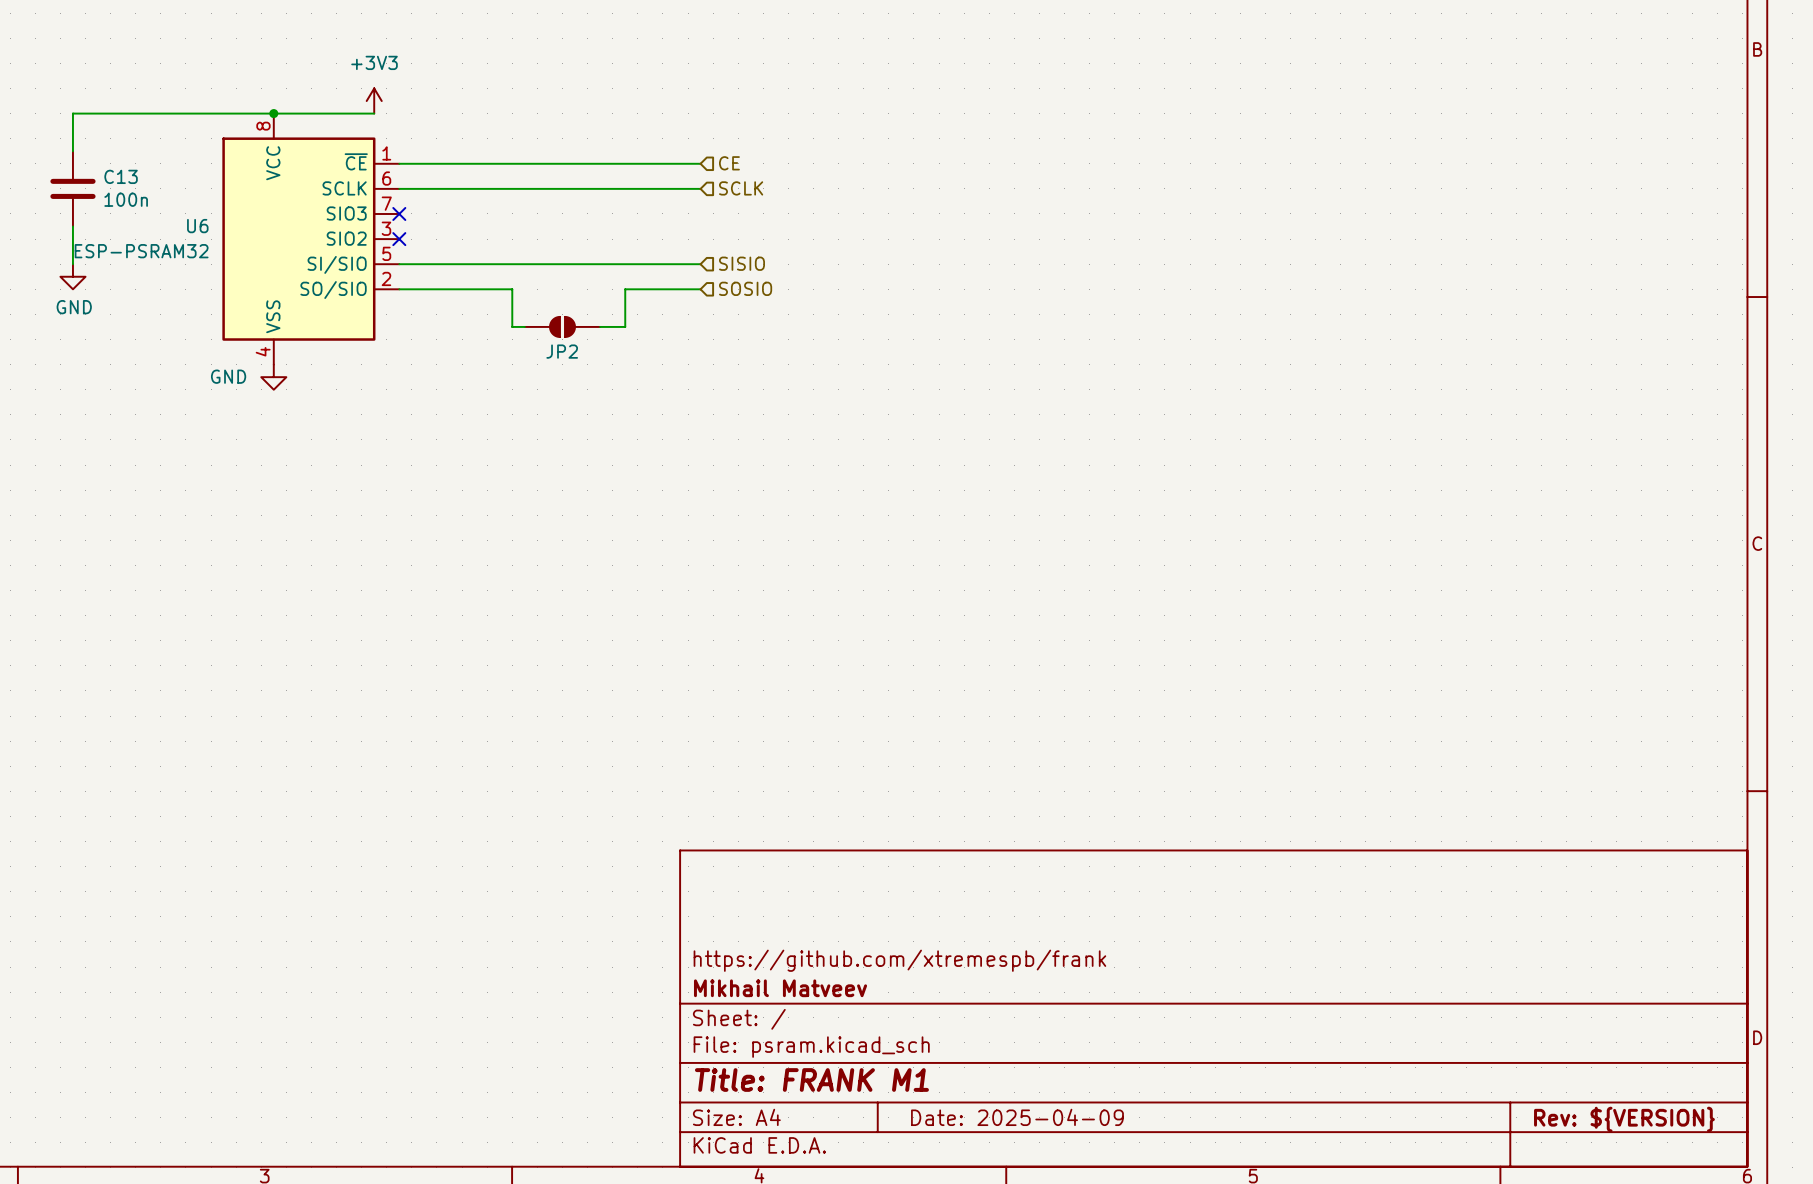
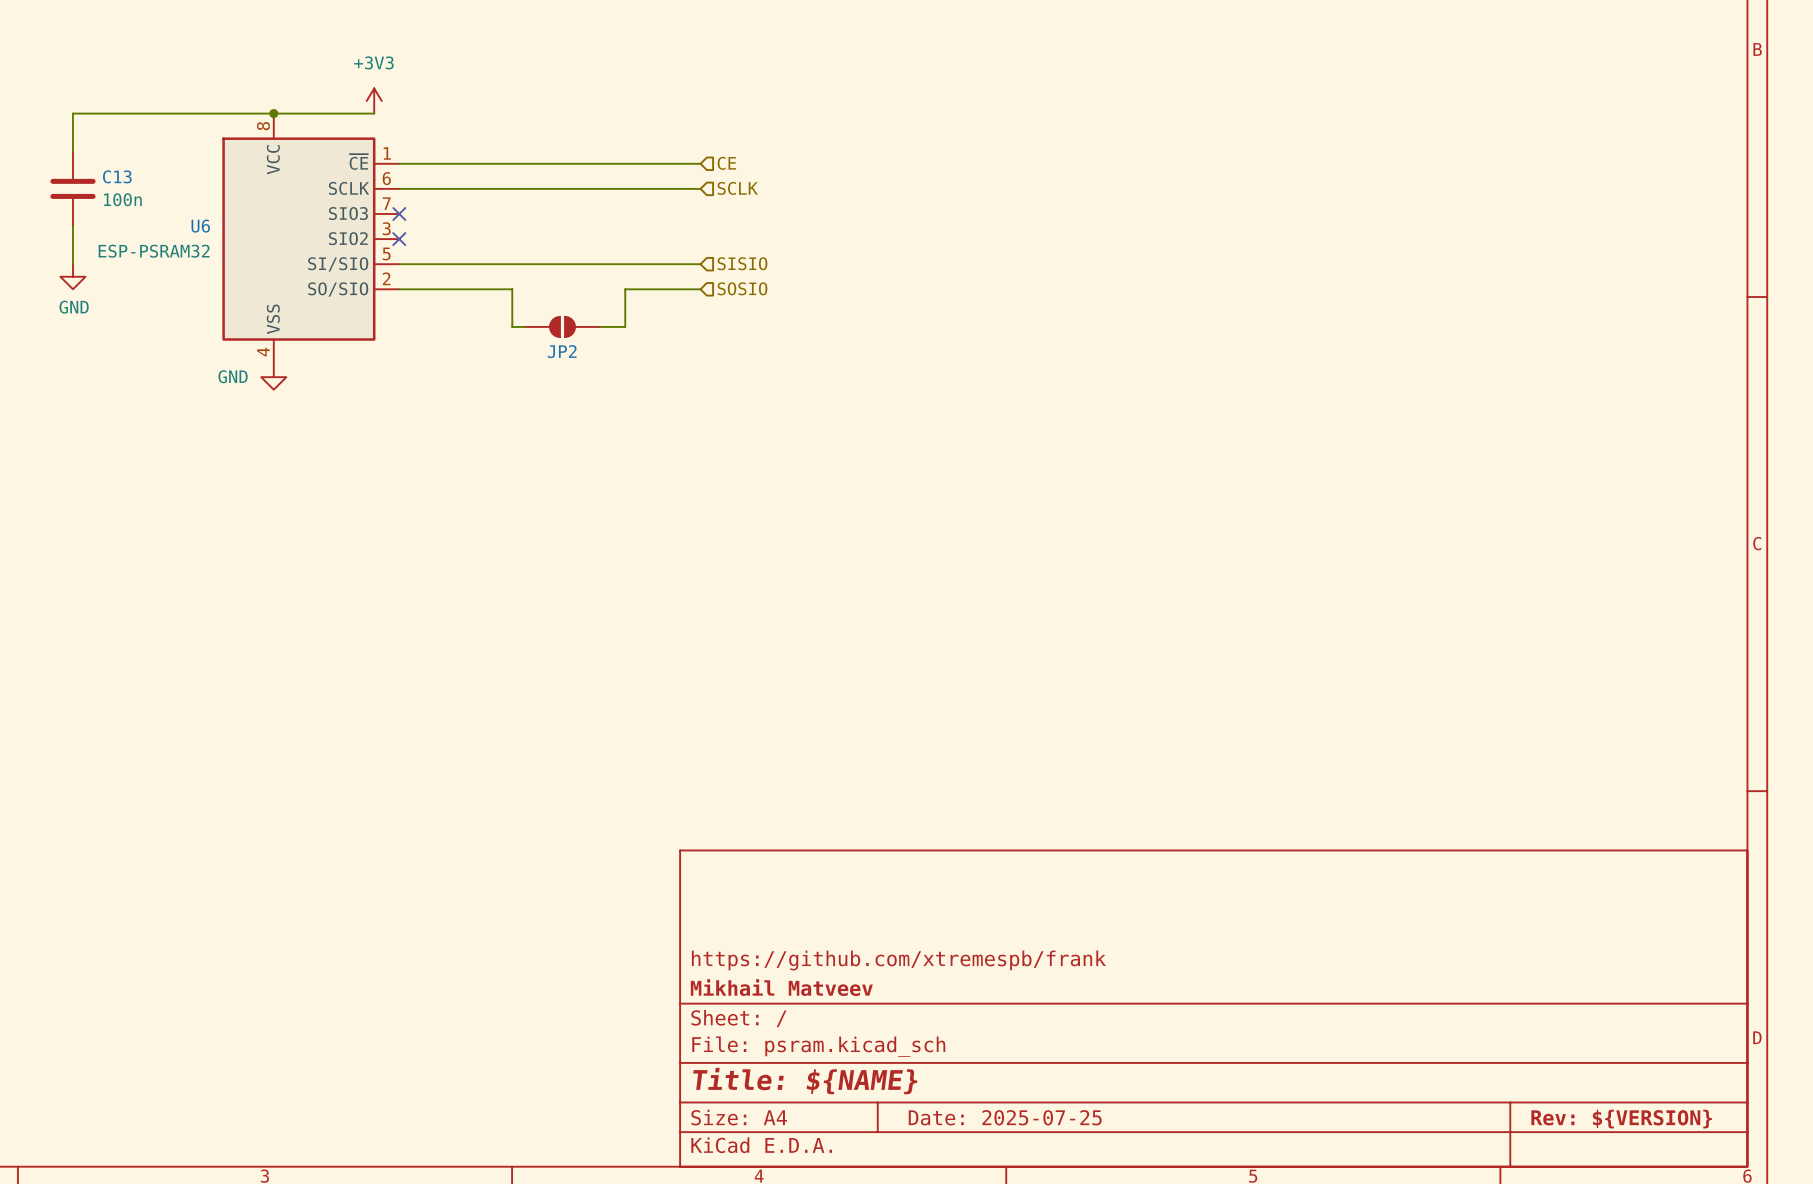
title block: Title: FRANK M1 (811, 1080) -> Title: ${NAME} (805, 1081)
title block: Date: 2025-04-09 (1017, 1117) -> Date: 2025-07-25 (1005, 1117)

